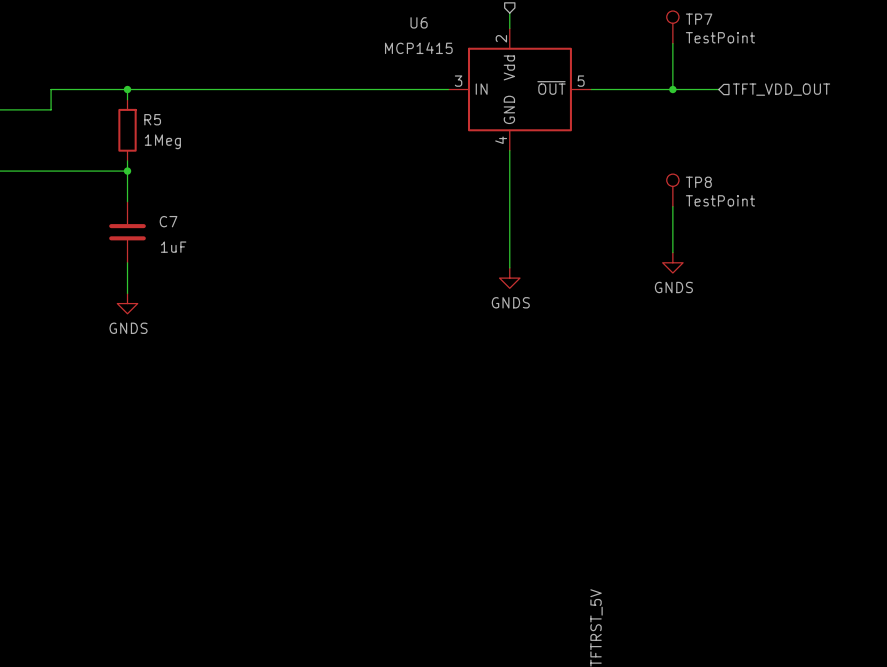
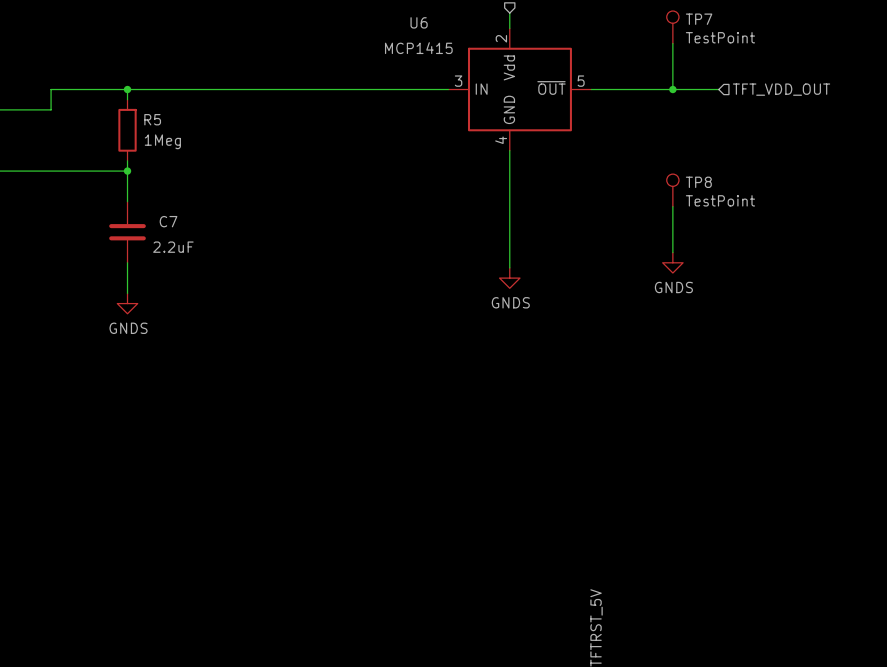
C7 value: 1uF (173, 247) -> 2.2uF (173, 247)

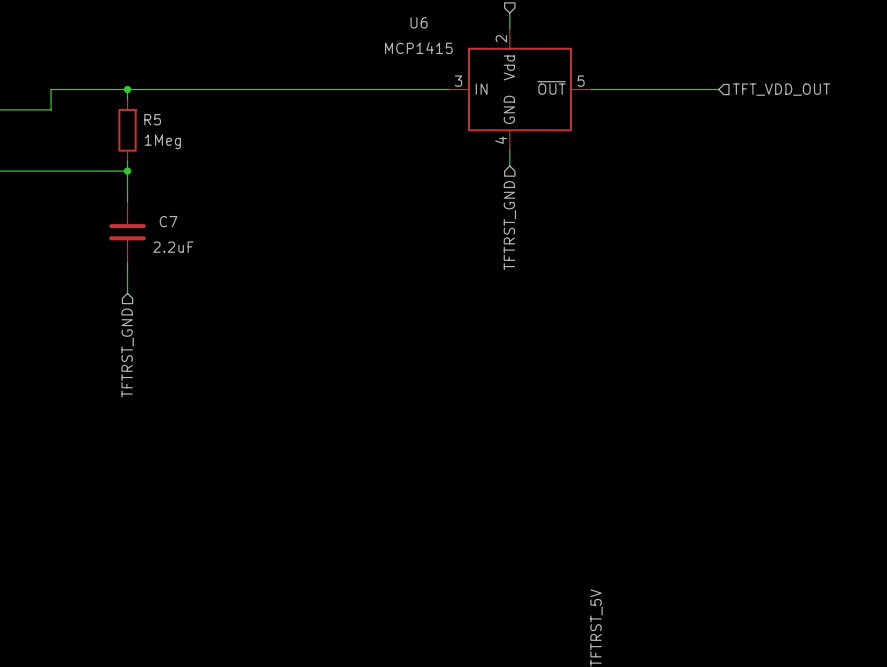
TP7: TestPoint (672, 27) -> none
wire: (672, 43) (672, 89) -> none
junction: (672, 89) -> none
wire: (509, 165) (509, 267) -> none
TP8: TestPoint (672, 190) -> none
wire: (672, 206) (672, 252) -> none
hierarchical label: none -> TFTRST_GND (509, 225)
power symbol: GNDS (672, 262) -> none
power symbol: GNDS (509, 278) -> none
power symbol: GNDS (127, 303) -> none
hierarchical label: none -> TFTRST_GND (127, 353)

